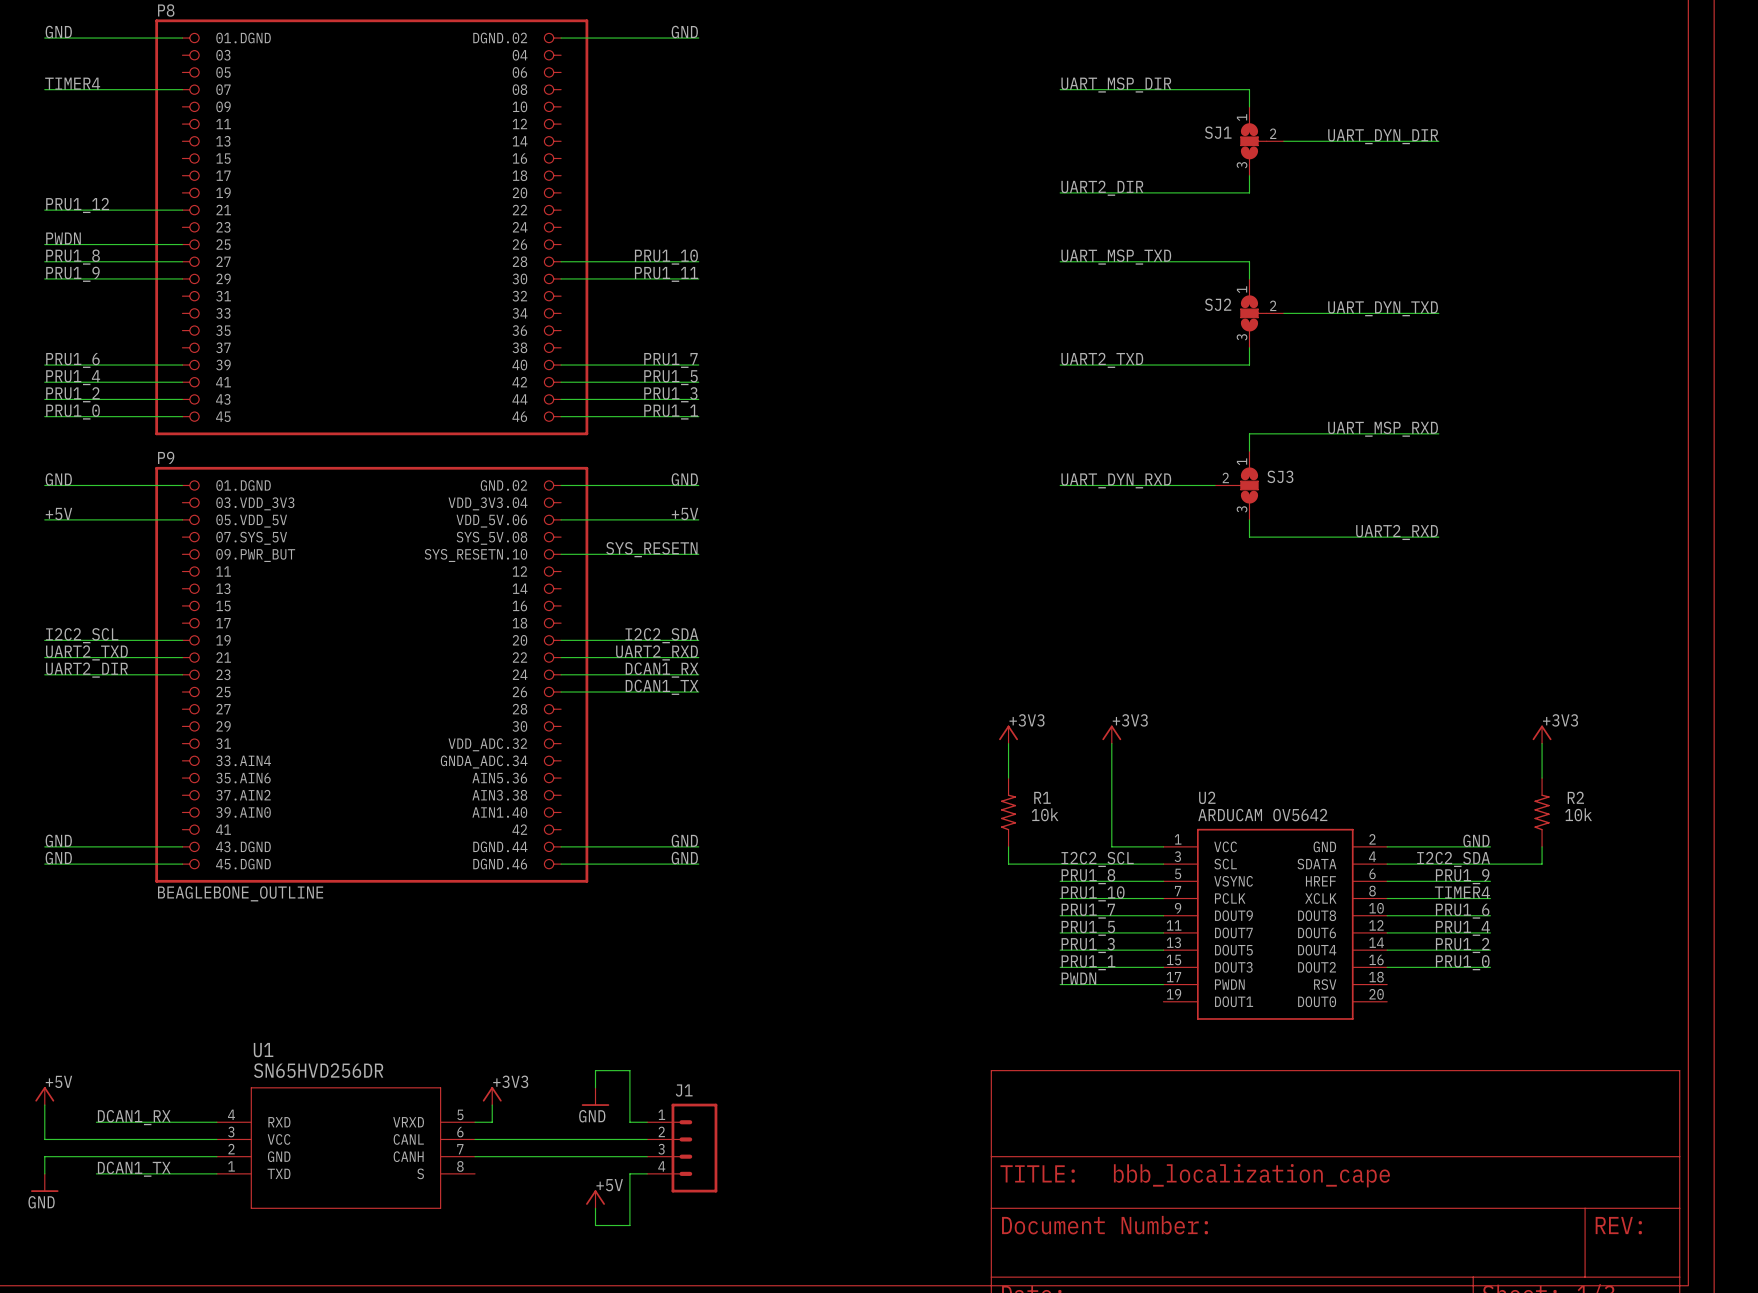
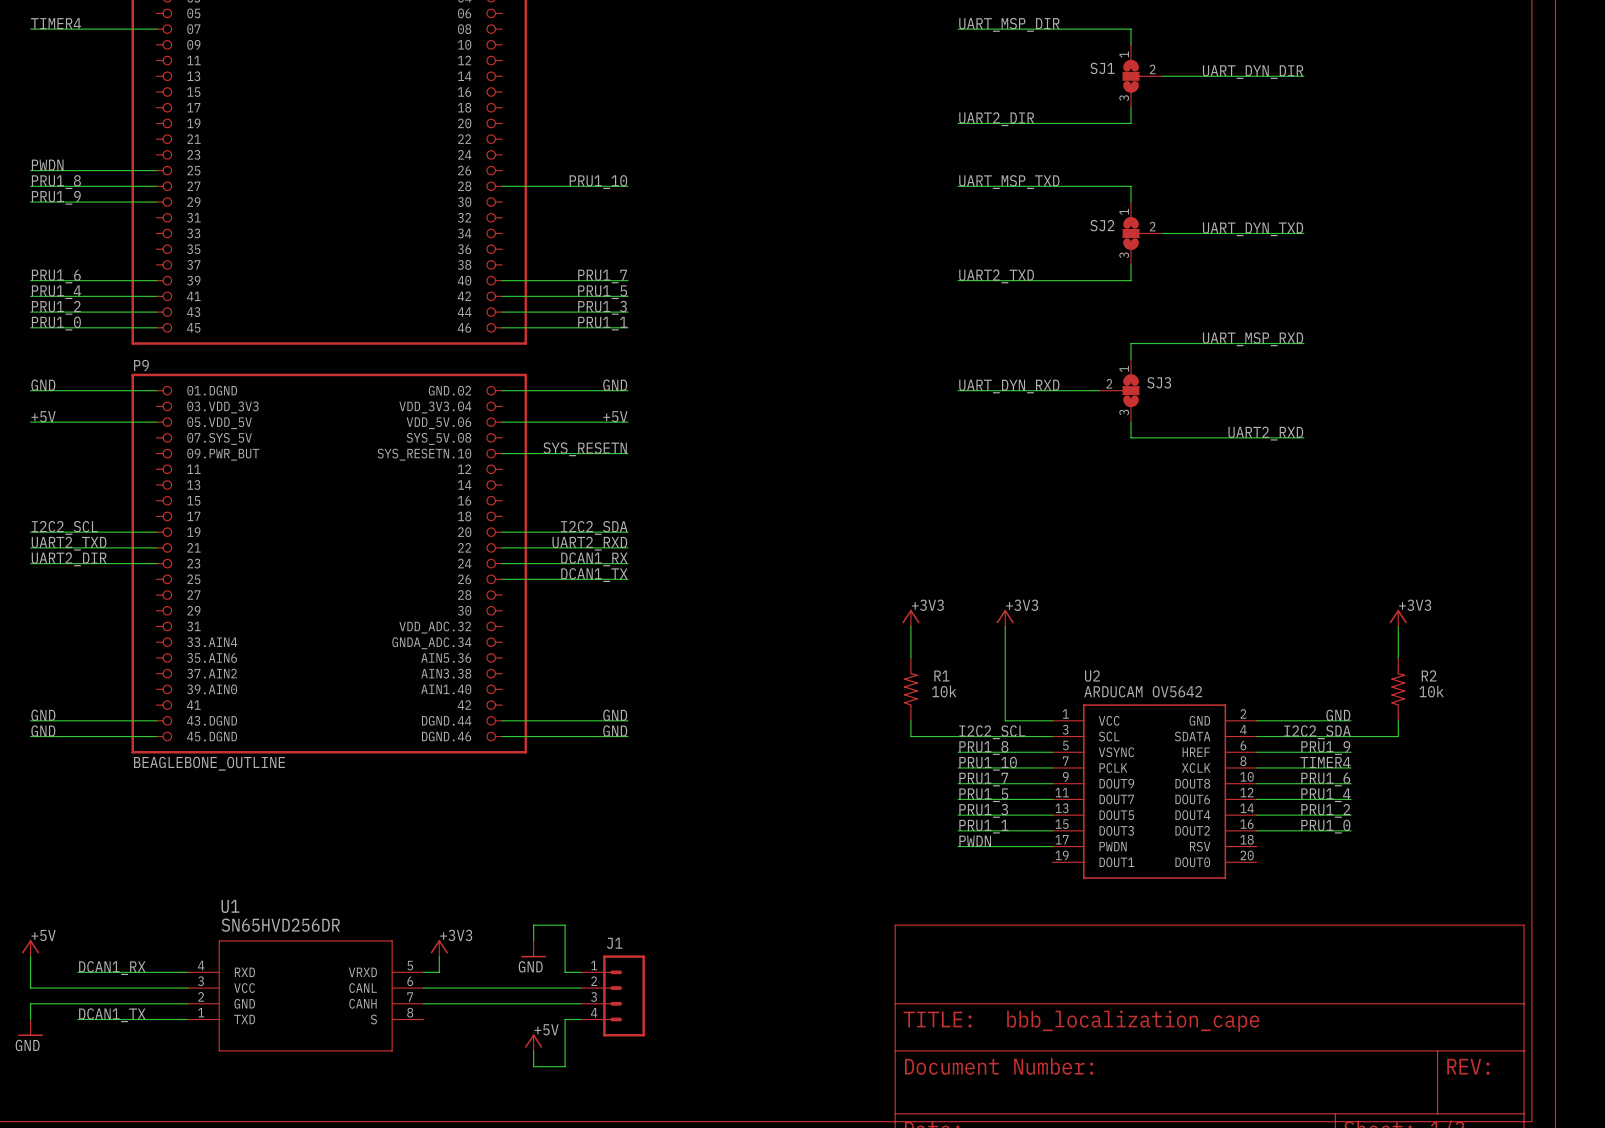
label: PRU1_12 (77, 205) -> none
wire: (44, 210) (182, 210) -> none
label: PRU1_11 (666, 274) -> none
wire: (561, 278) (698, 278) -> none

